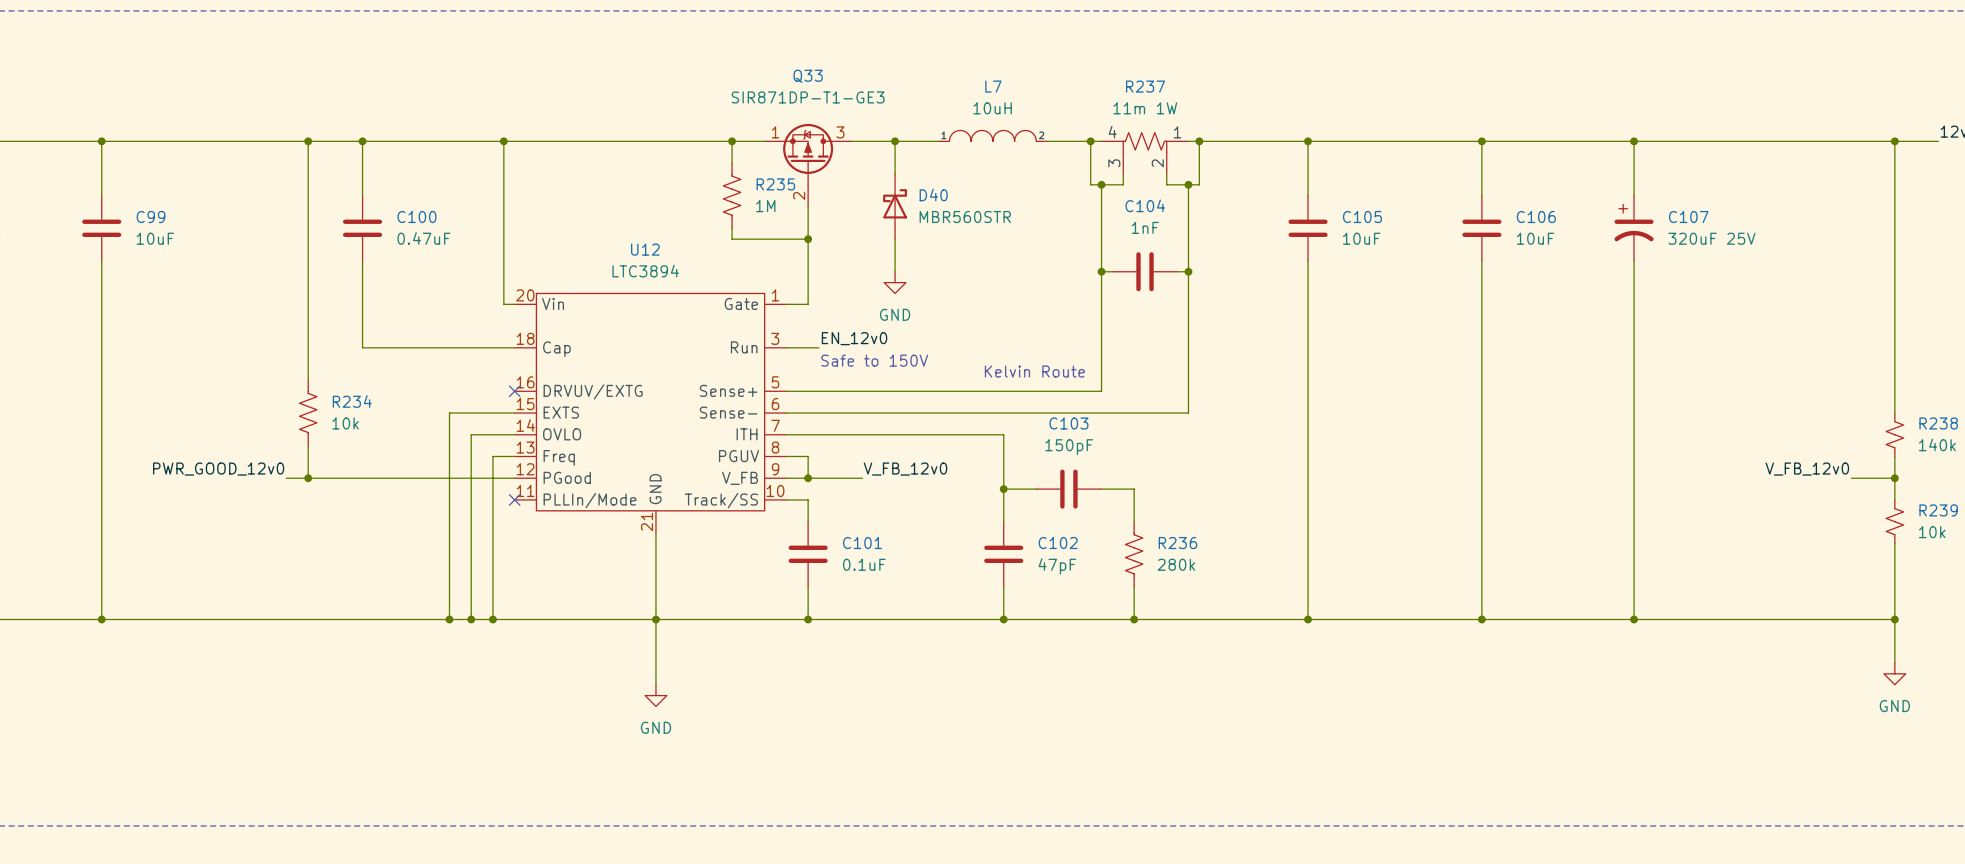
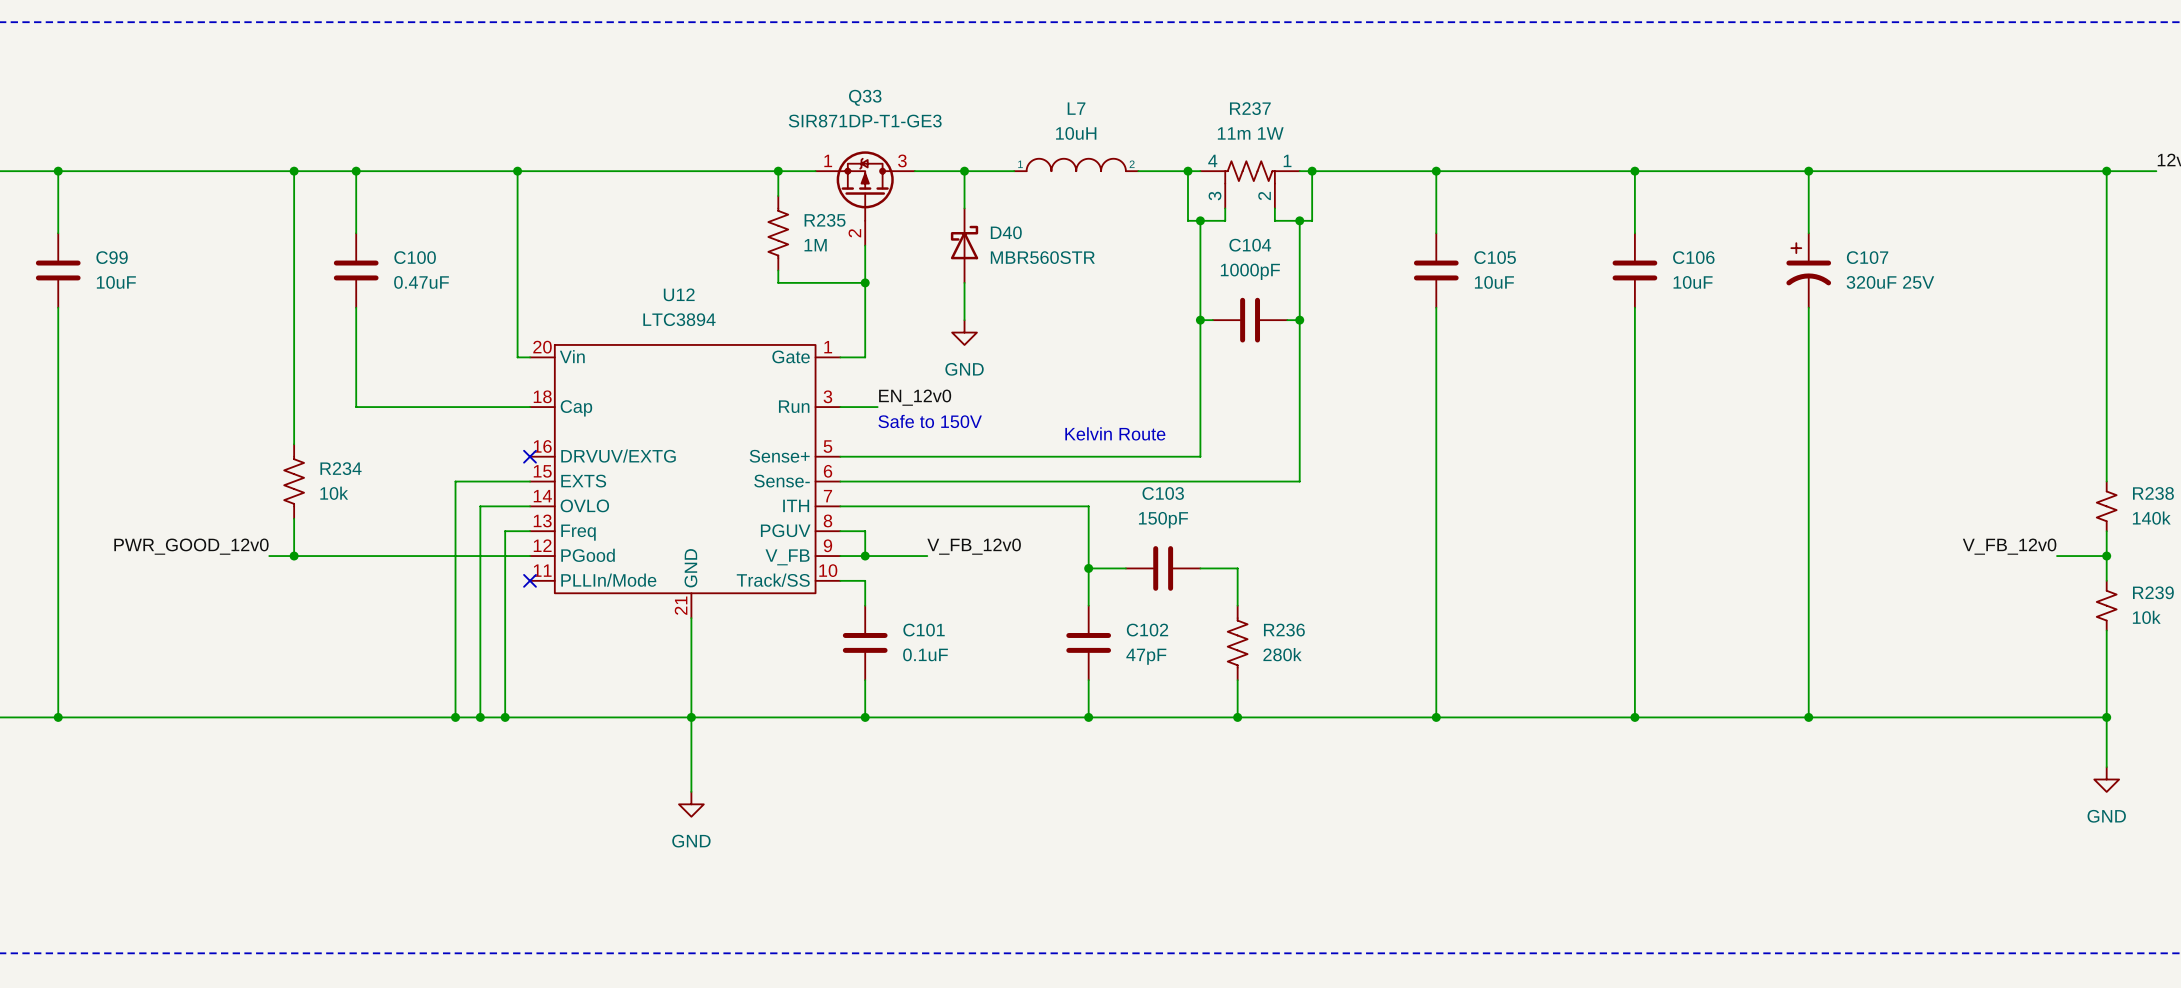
C104 value: 1nF (1145, 227) -> 1000pF (1250, 271)

